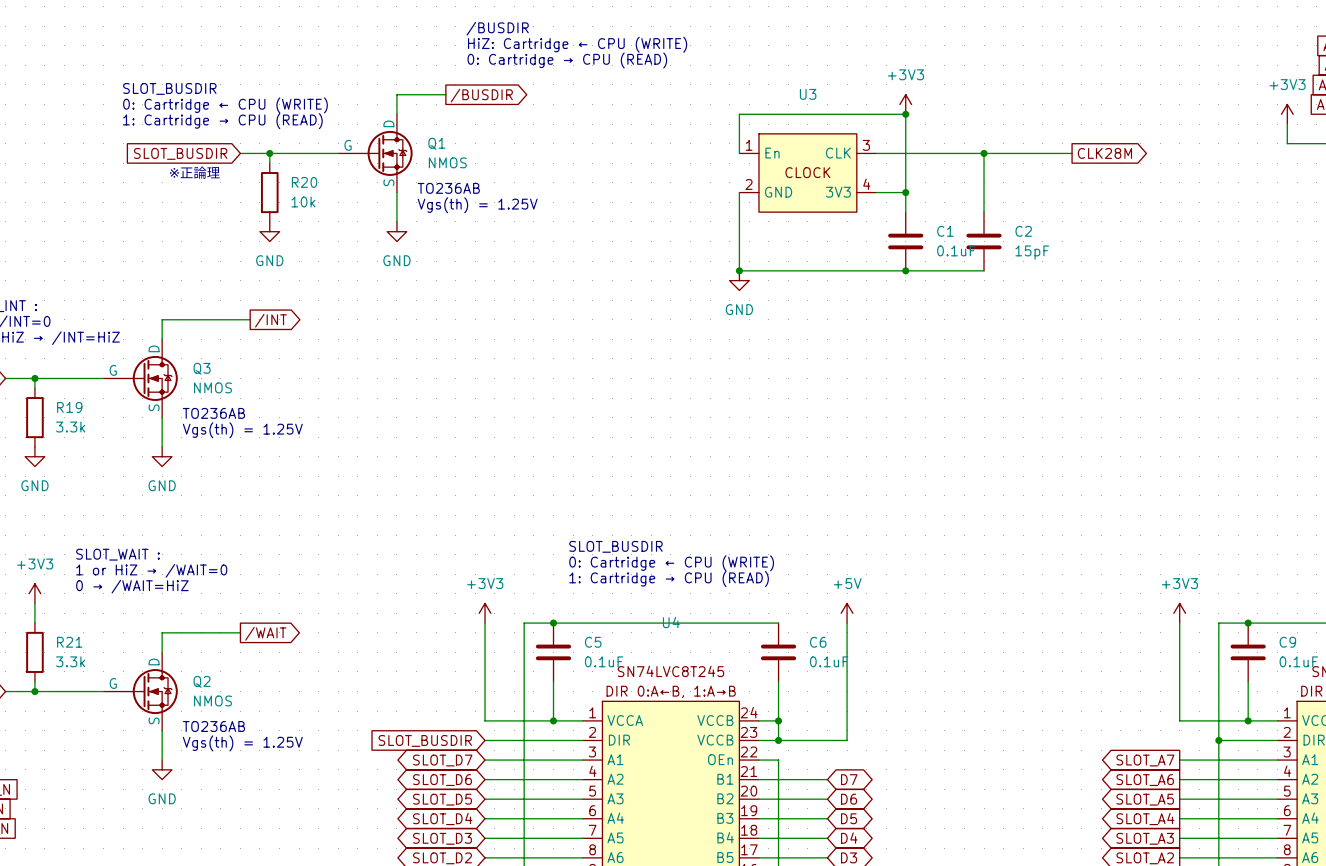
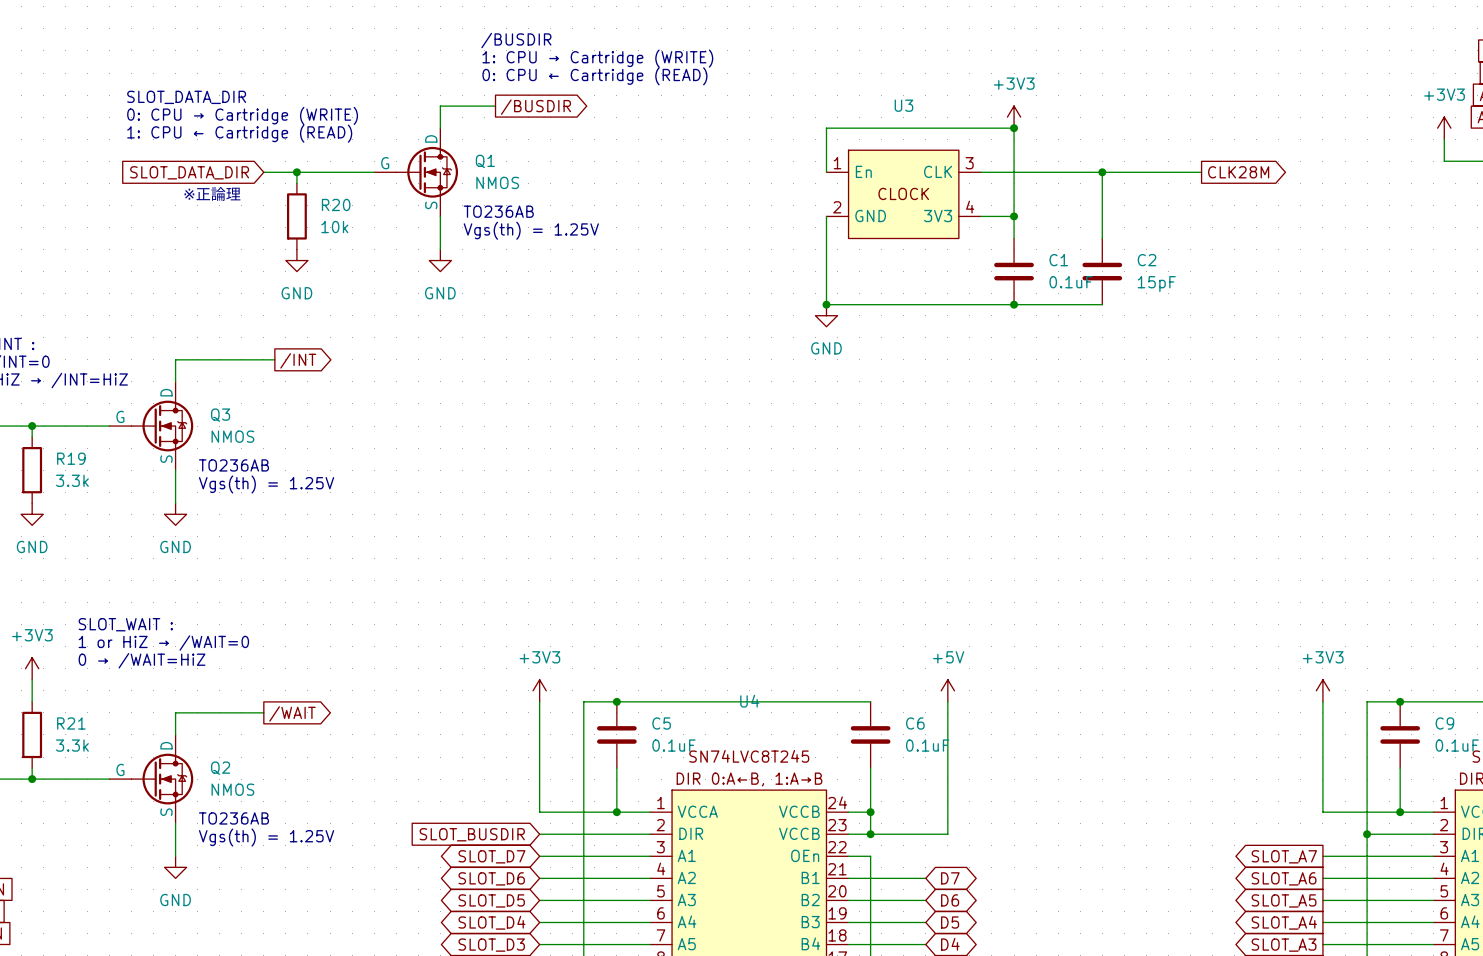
text position: /BUSDIR (497, 28) -> /BUSDIR (516, 40)
text: HiZ: Cartridge ← CPU (WRITE) (577, 44) -> none
text: none -> 1: CPU → Cartridge (WRITE) (597, 58)
text: 0: Cartridge → CPU (READ) (567, 60) -> none
text: none -> 0: CPU ← Cartridge (READ) (594, 76)
text: SLOT_BUSDIR (169, 88) -> SLOT_DATA_DIR (186, 97)
text: 0: Cartridge ← CPU (WRITE) (225, 105) -> 0: CPU → Cartridge (WRITE) (242, 115)
text: 1: Cartridge → CPU (READ) (222, 121) -> 1: CPU ← Cartridge (READ) (239, 133)
global label: SLOT_BUSDIR (180, 153) -> SLOT_DATA_DIR (189, 172)
text: SLOT_BUSDIR (615, 546) -> none
text: 0: Cartridge ← CPU (WRITE) (671, 563) -> none
text: 1: Cartridge → CPU (READ) (669, 579) -> none

